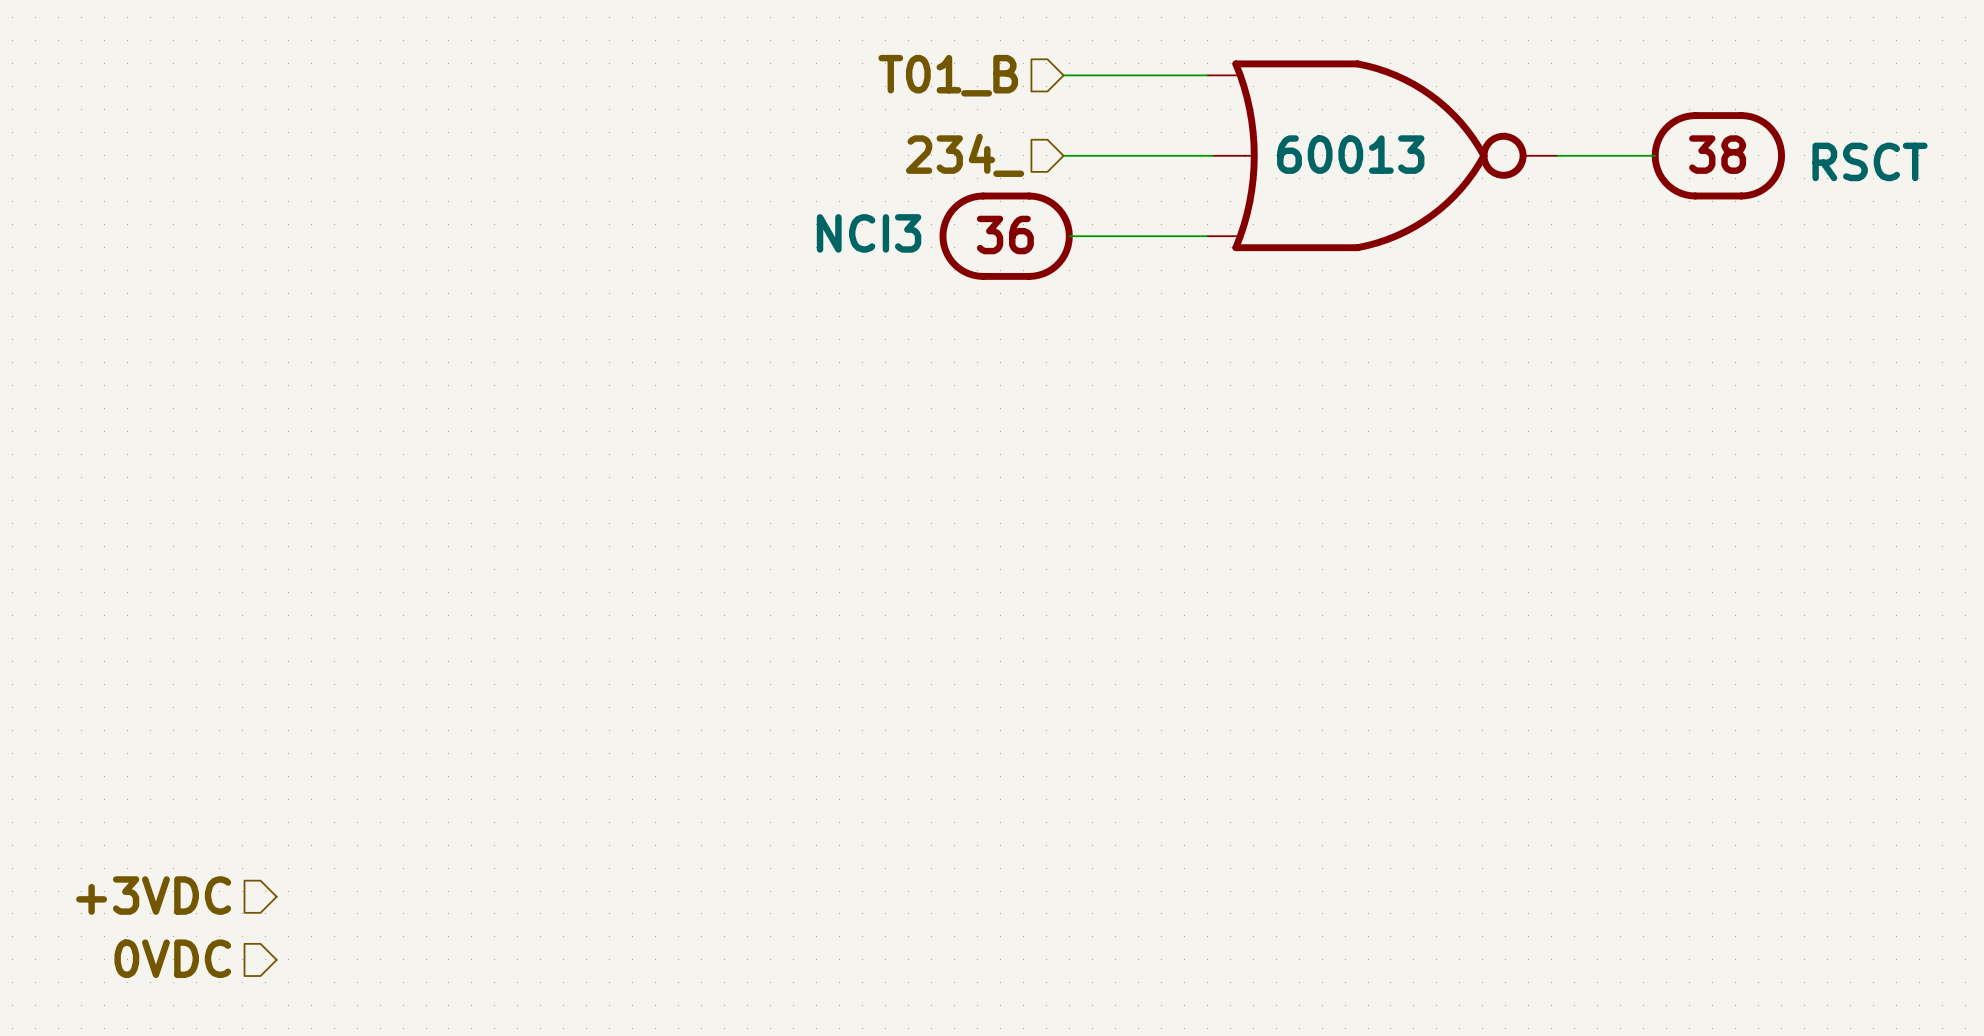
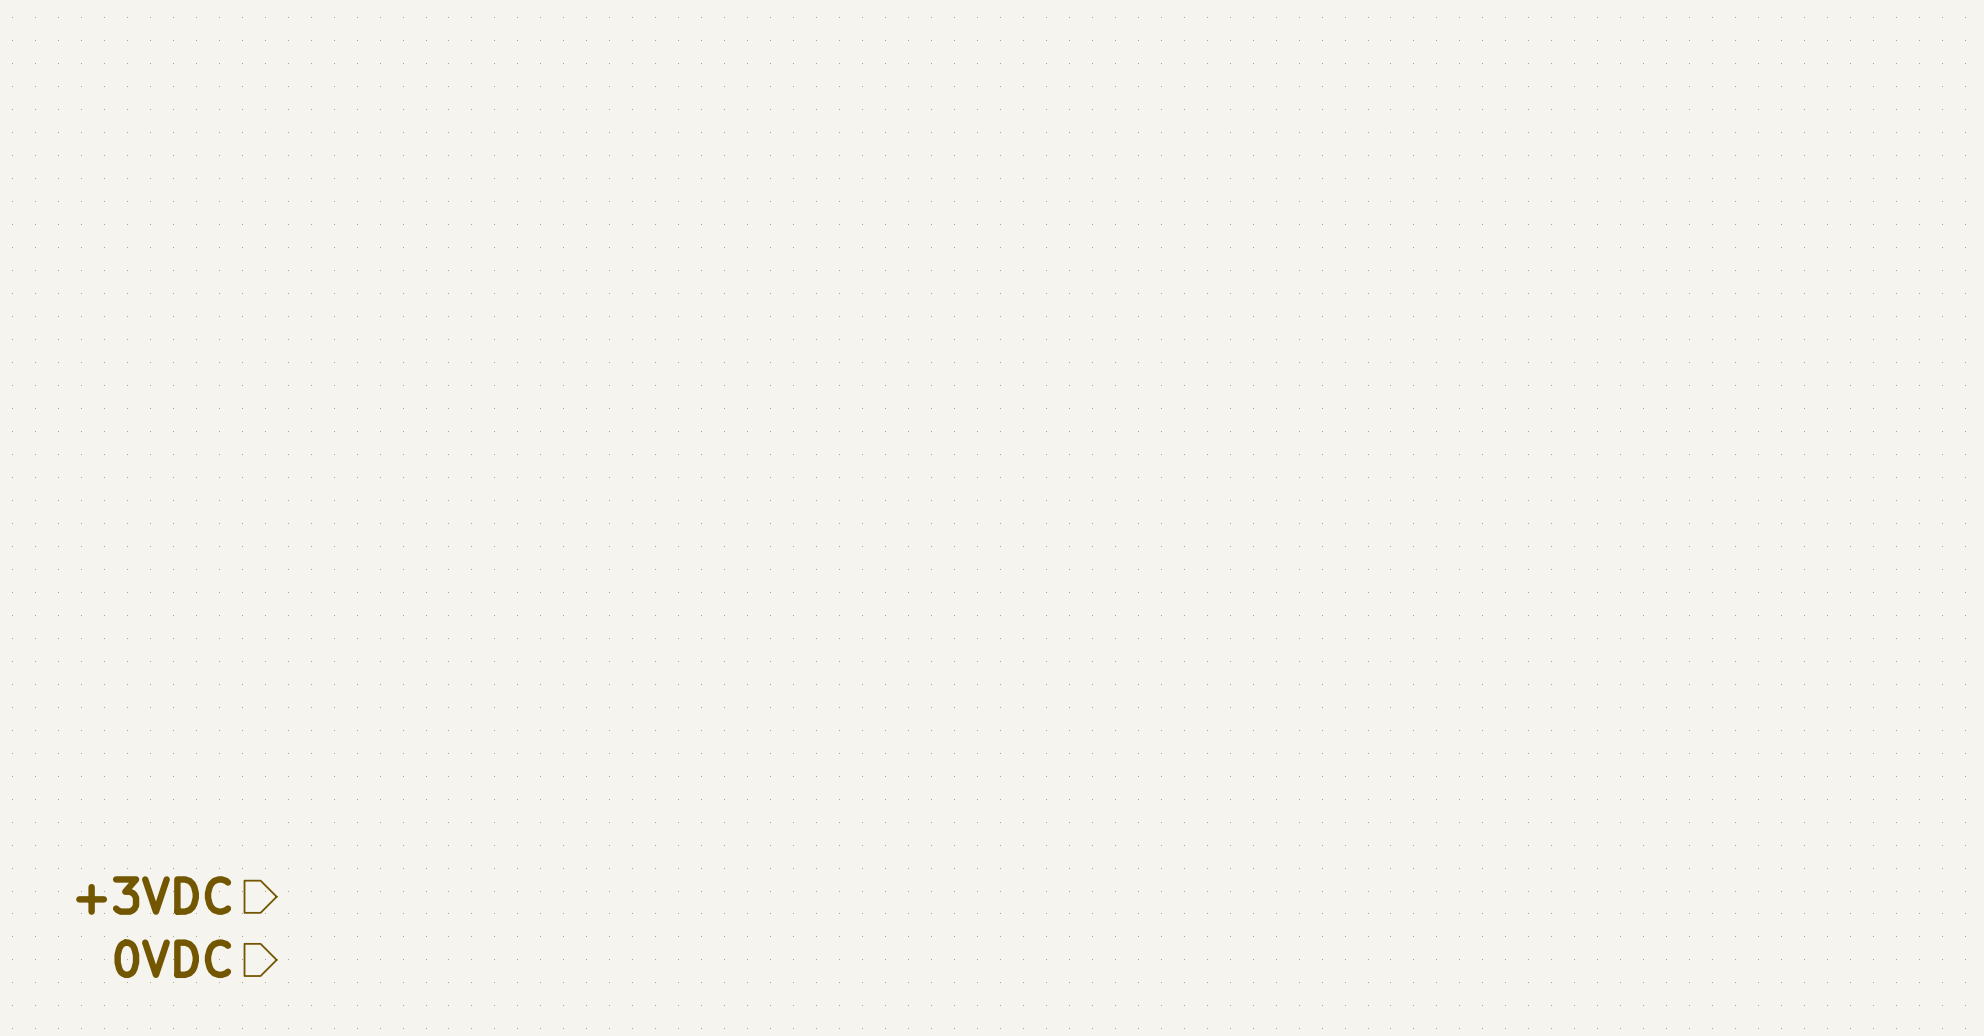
hierarchical label: T01_B (948, 75) -> none
wire: (1063, 75) (1207, 75) -> none
hierarchical label: 234_ (965, 155) -> none
wire: (1063, 155) (1212, 155) -> none
part: (1382, 155) -> none
wire: (1557, 155) (1655, 155) -> none
part: (1718, 155) -> none
part: (1006, 236) -> none
wire: (1069, 236) (1207, 236) -> none

